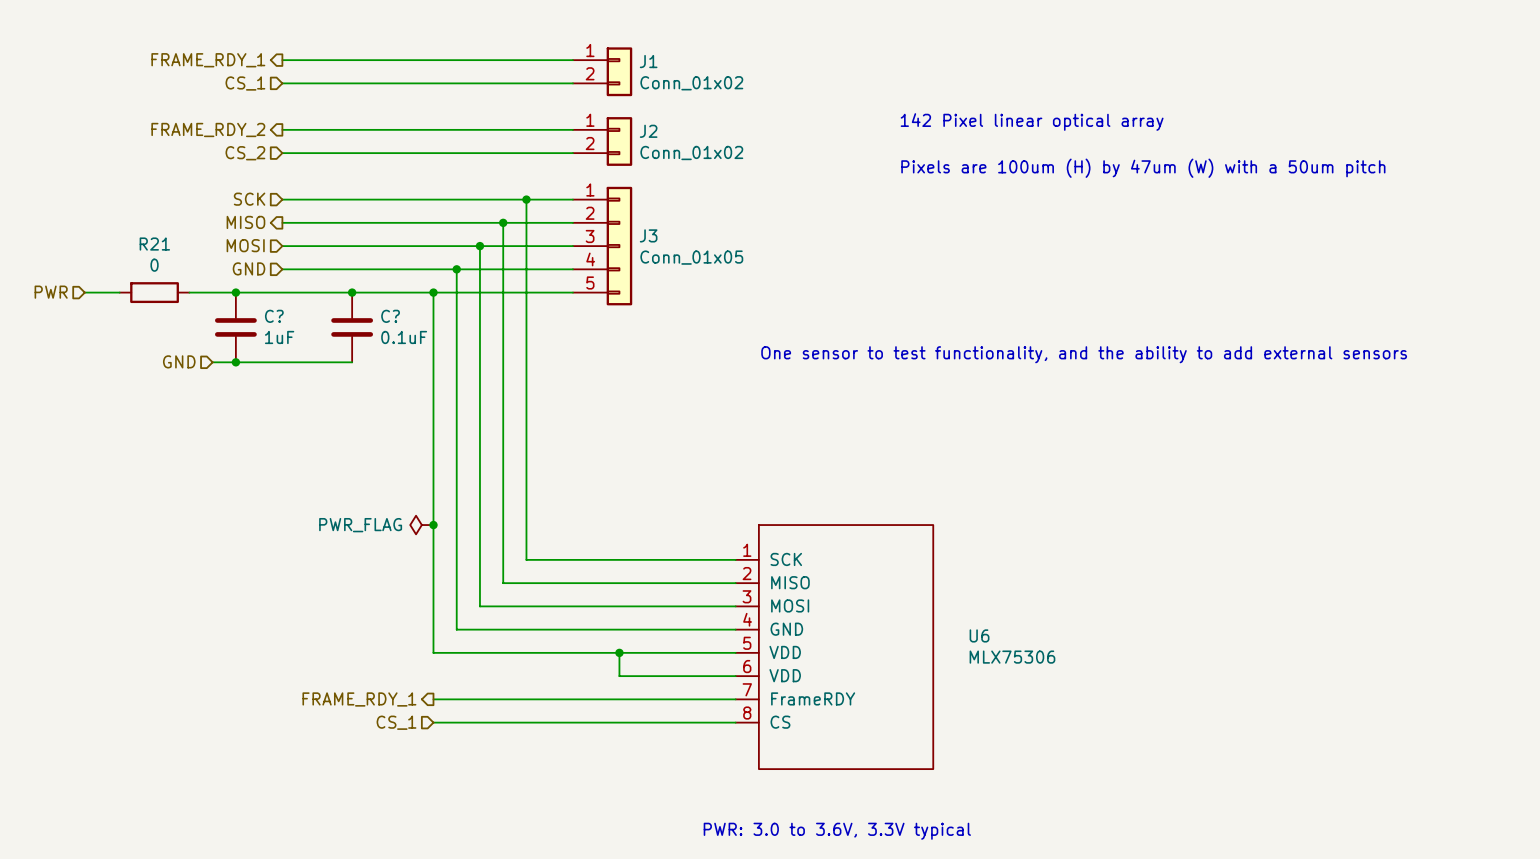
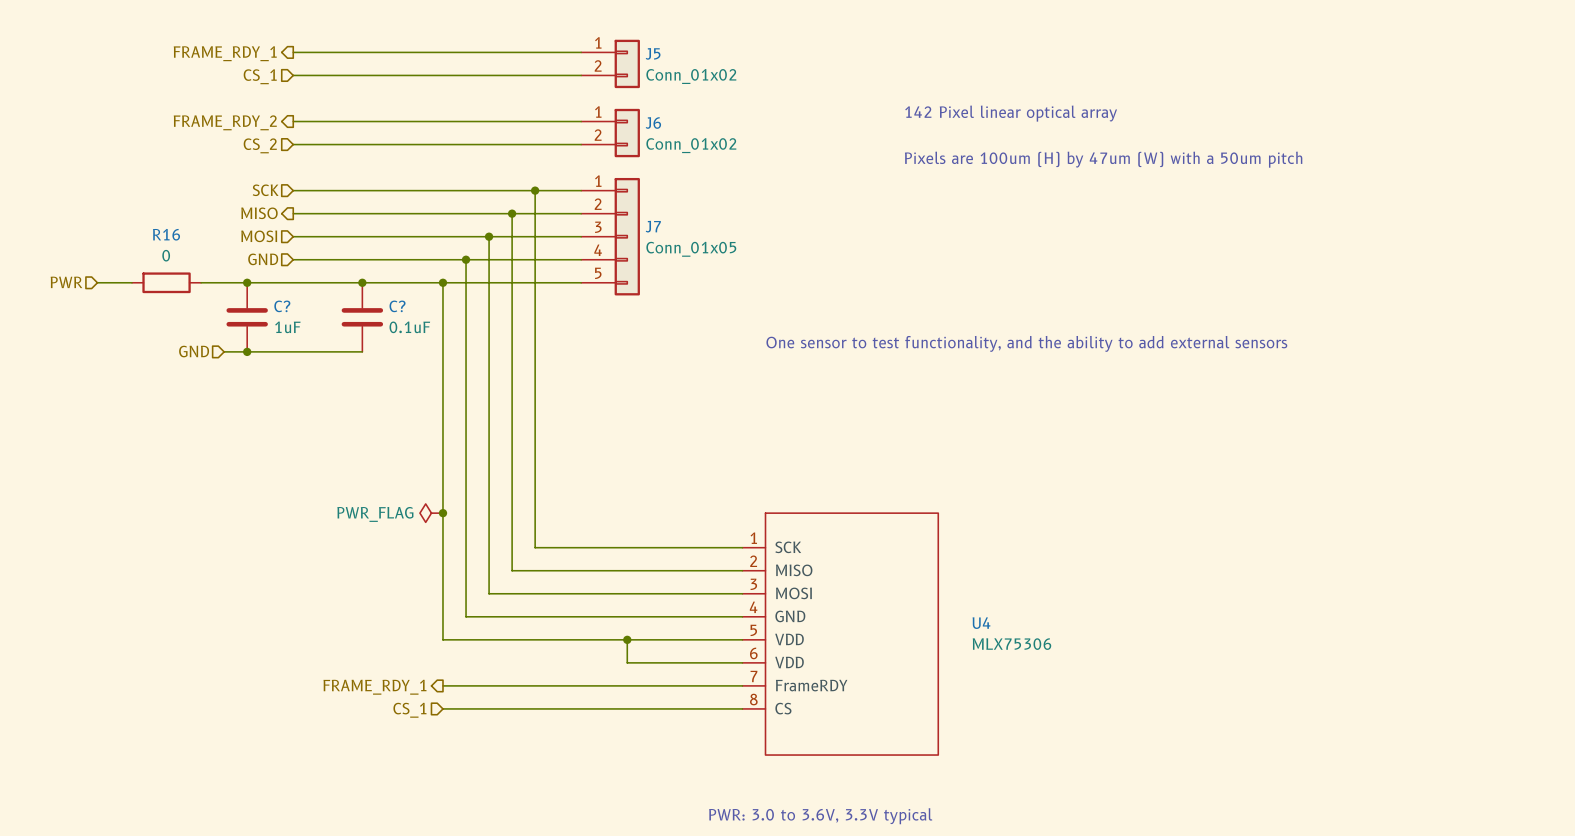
J1 name: J1 (648, 61) -> J5 (653, 53)
J2 name: J2 (648, 131) -> J6 (653, 123)
J3 name: J3 (648, 235) -> J7 (653, 226)
R21 name: R21 (154, 244) -> R16 (166, 234)
U6 name: U6 (979, 635) -> U4 (981, 623)

